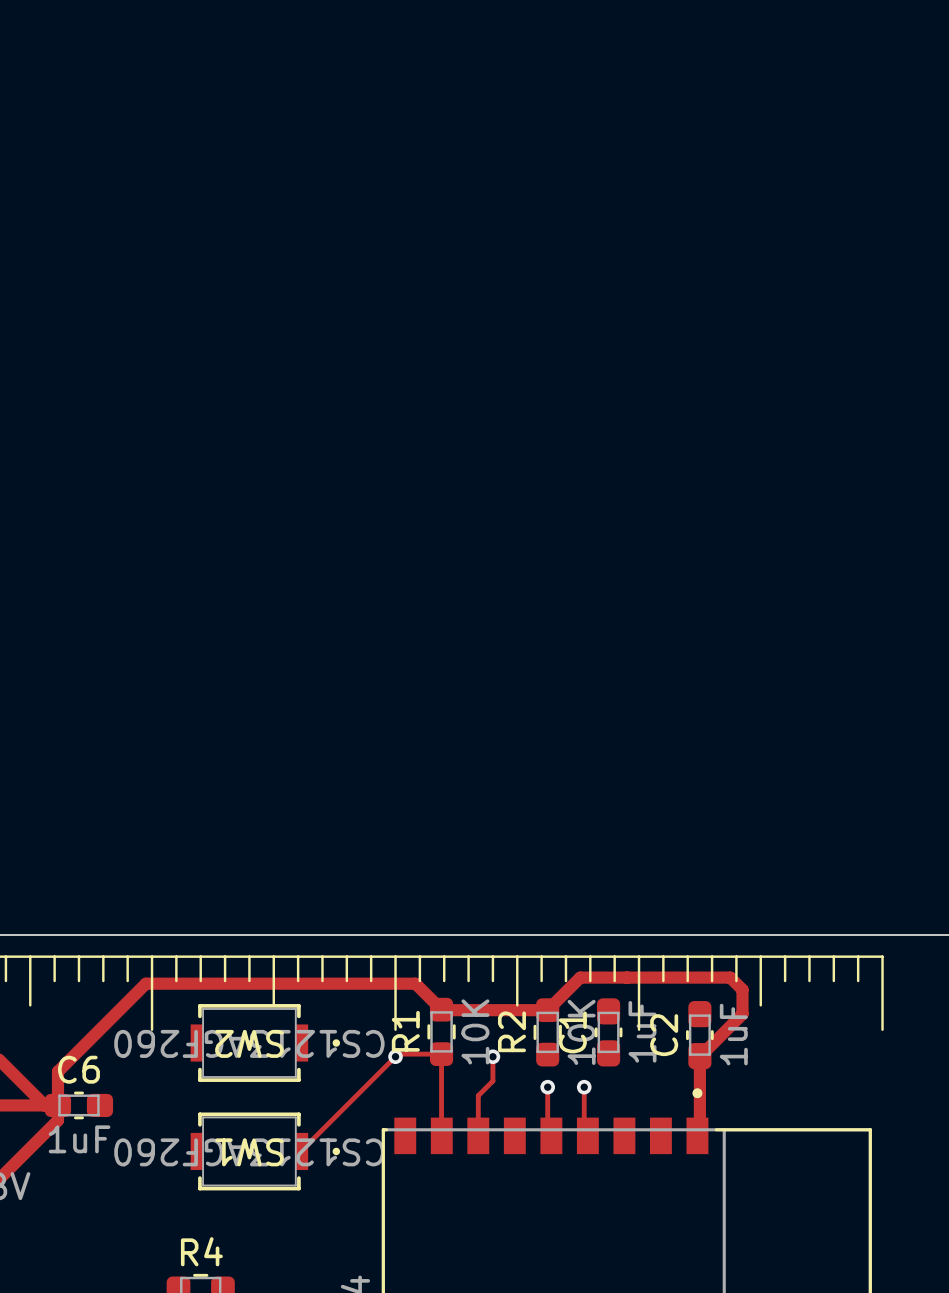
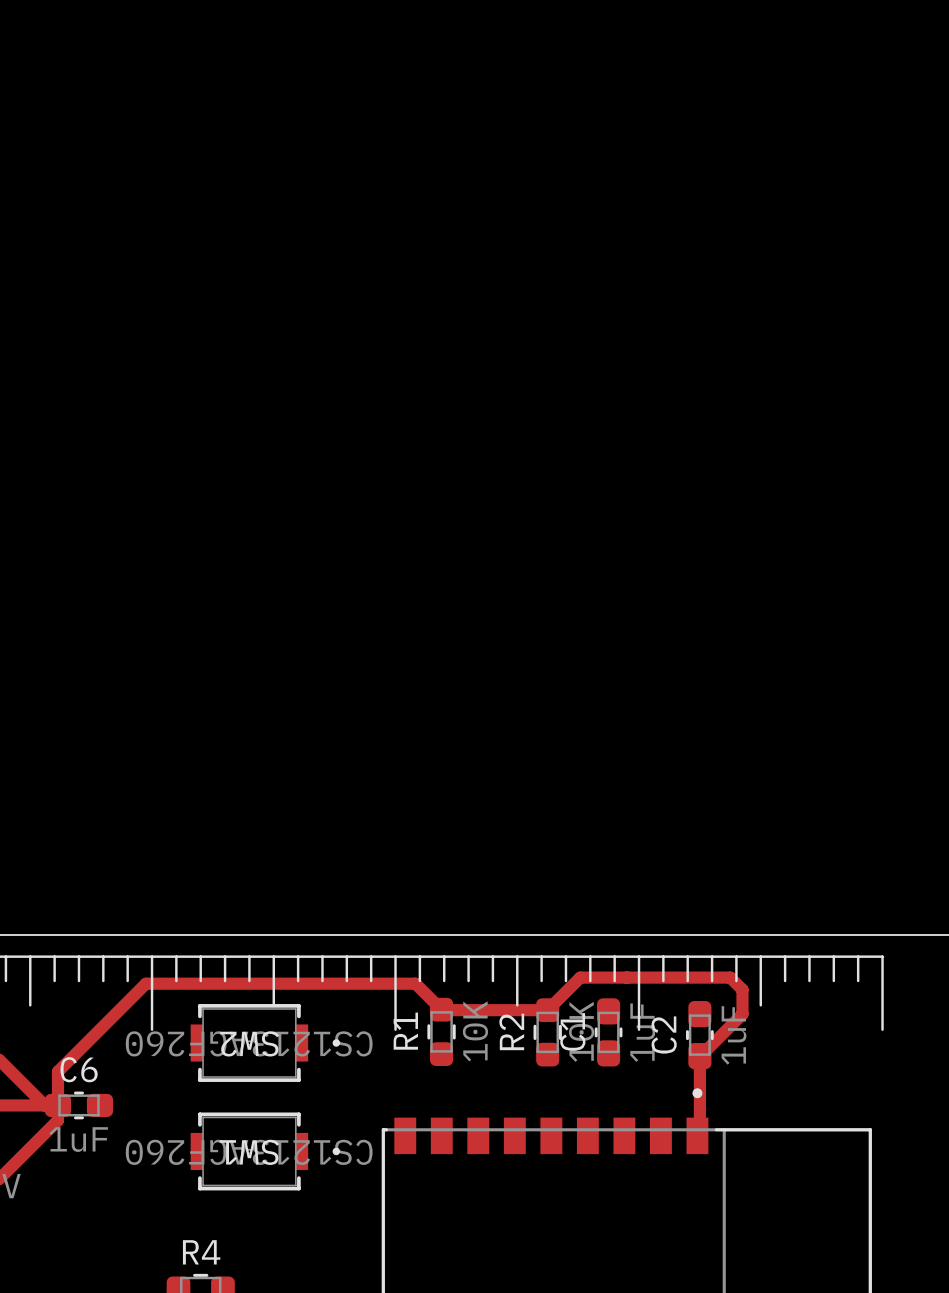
via: (395, 1056) -> none
track: (492, 1056) (492, 1081) (478, 1095) (478, 1135) -> none
via: (492, 1056) -> none
track: (547, 1087) (547, 1132) (551, 1135) -> none
via: (547, 1087) -> none
track: (584, 1087) (584, 1128) (587, 1132) (587, 1135) -> none
via: (584, 1087) -> none
track: (441, 1135) (441, 1054) (398, 1054) (301, 1151) -> none

